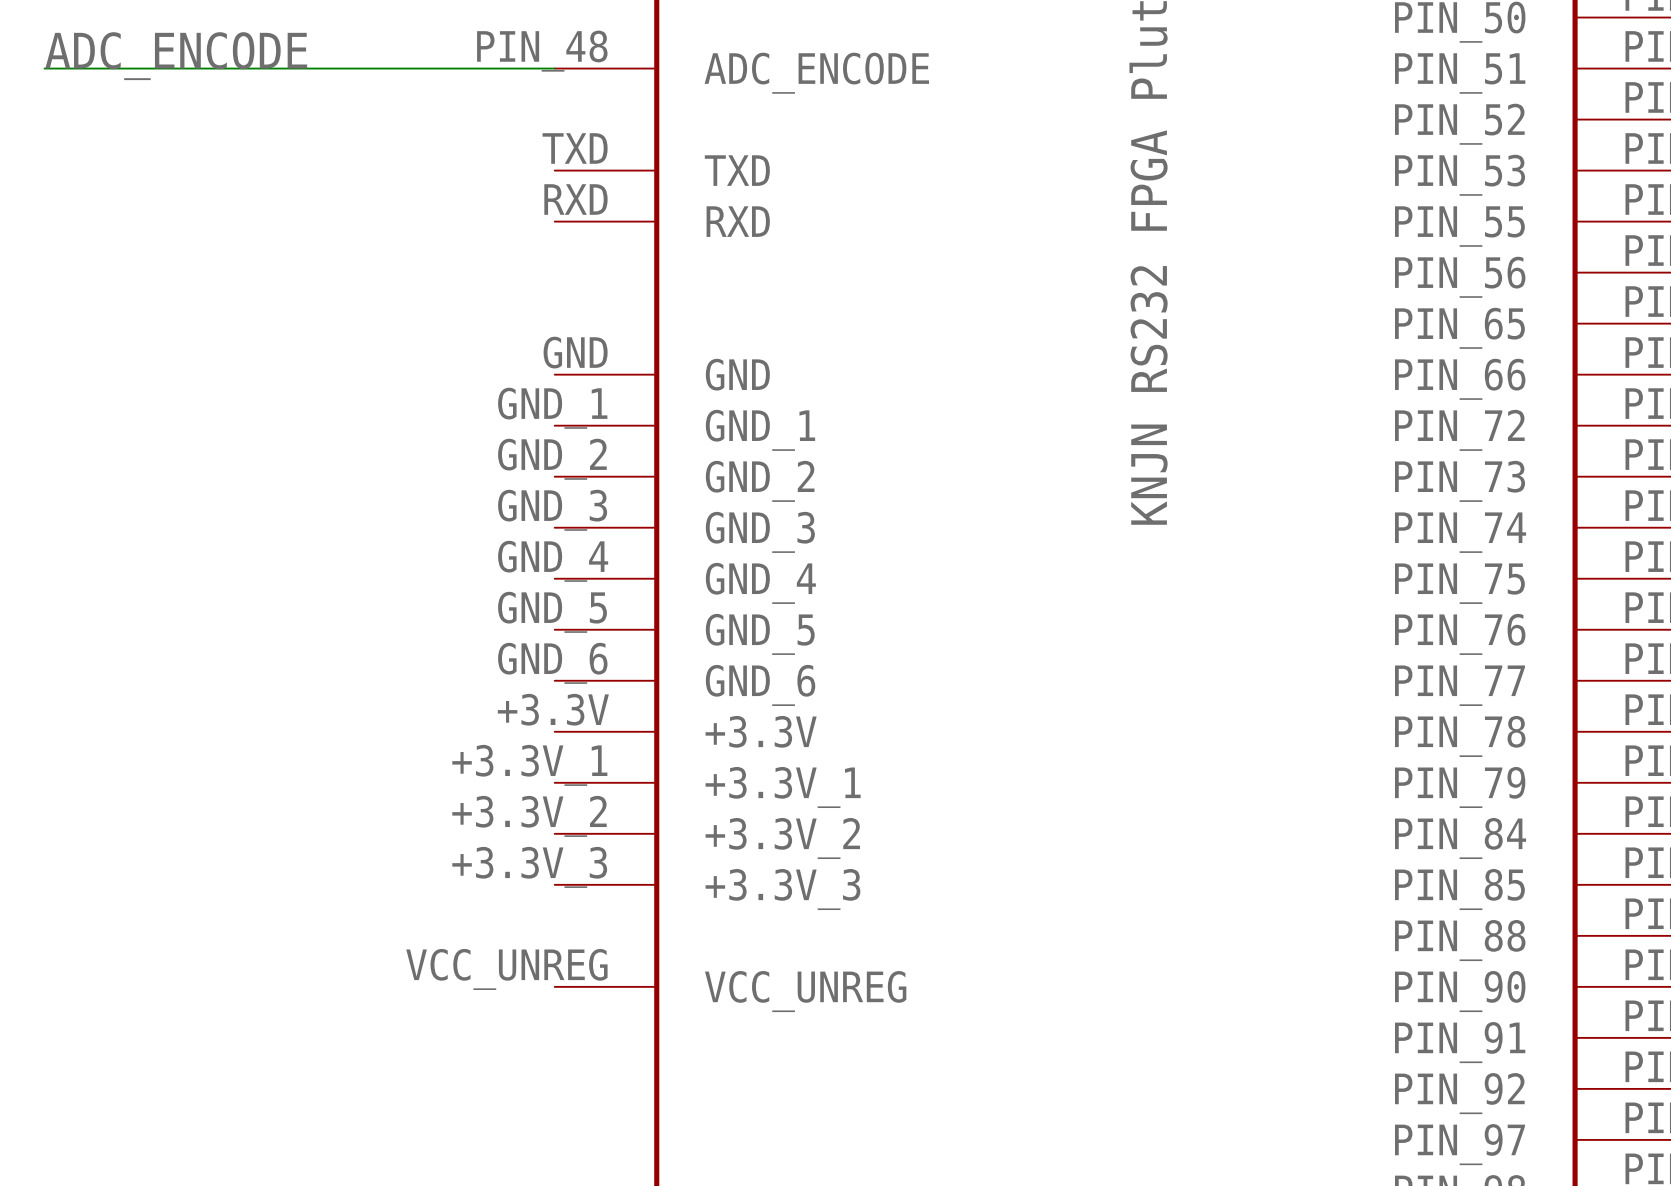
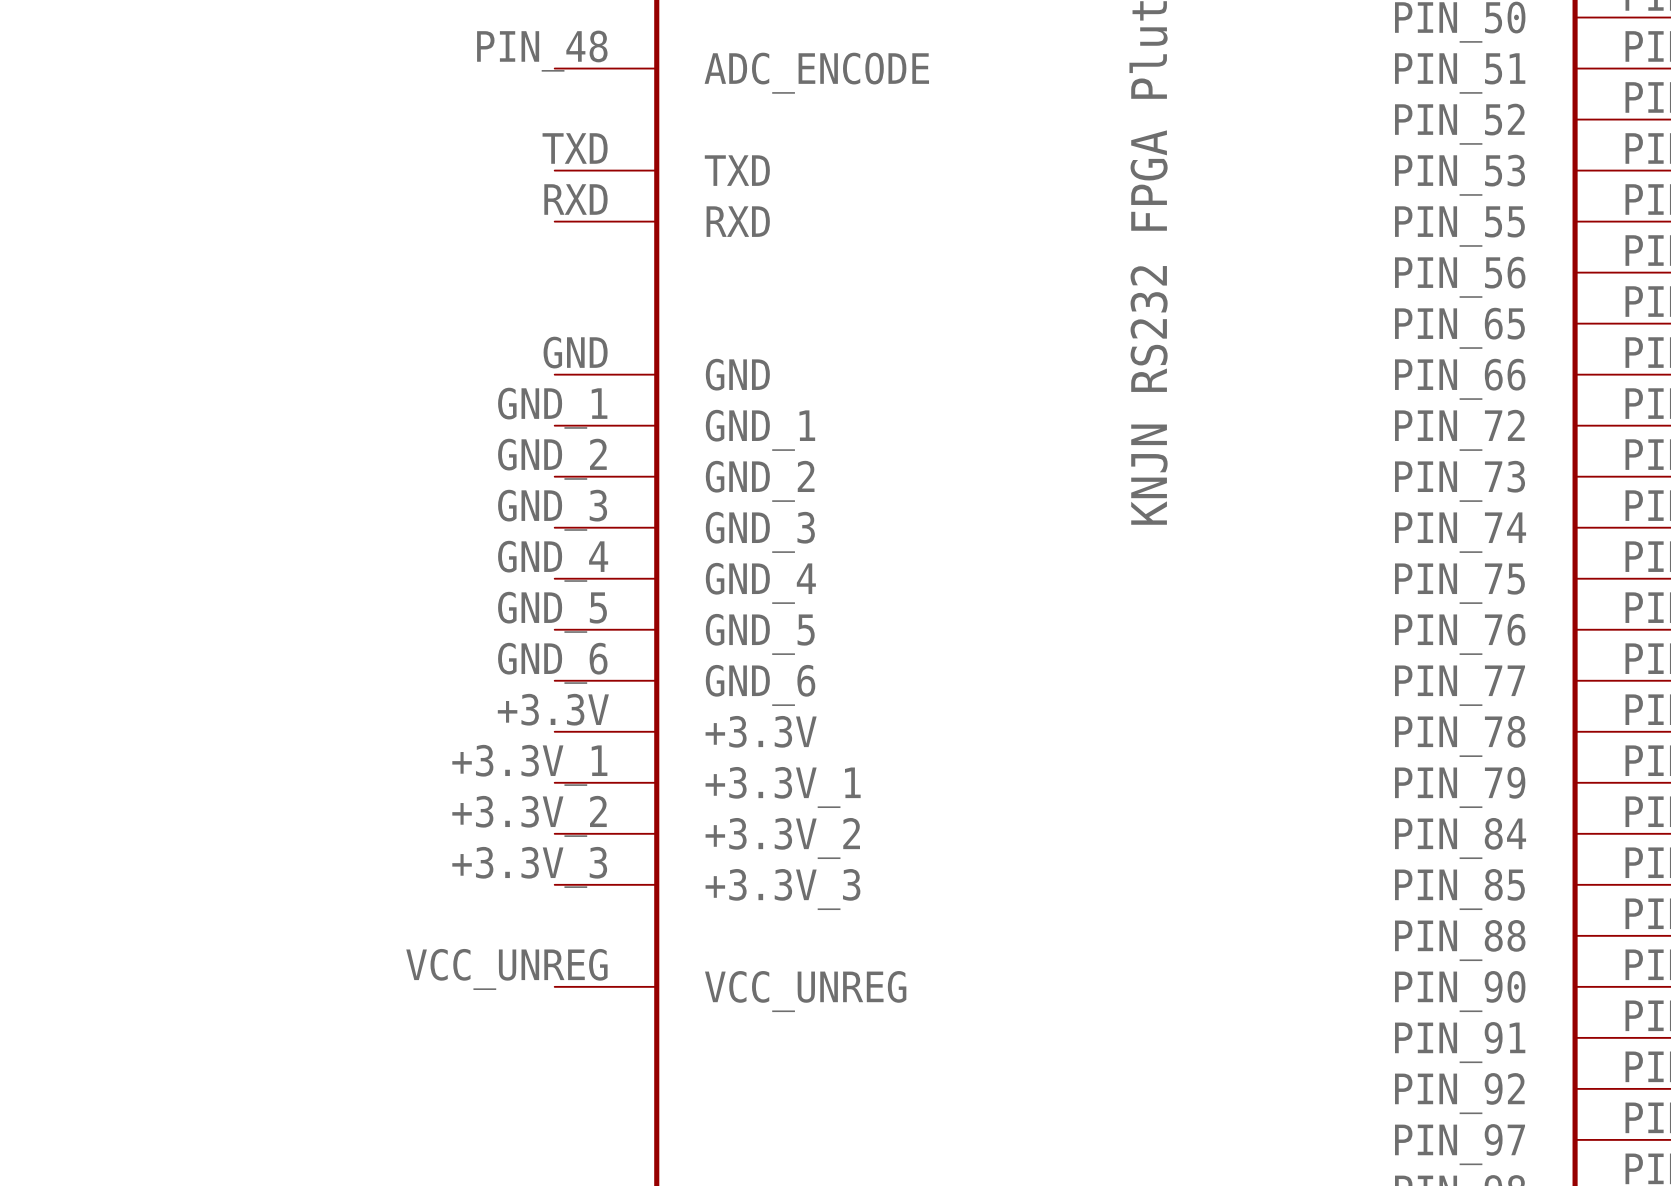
label: ADC_ENCODE (176, 56) -> none
wire: (44, 68) (554, 68) -> none

